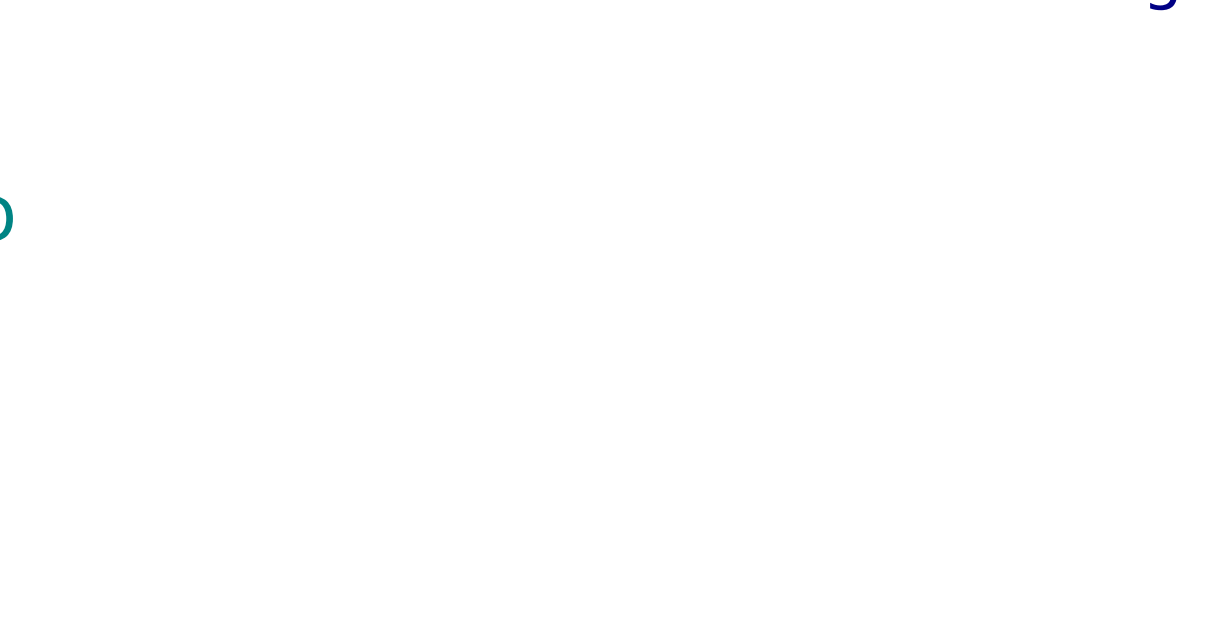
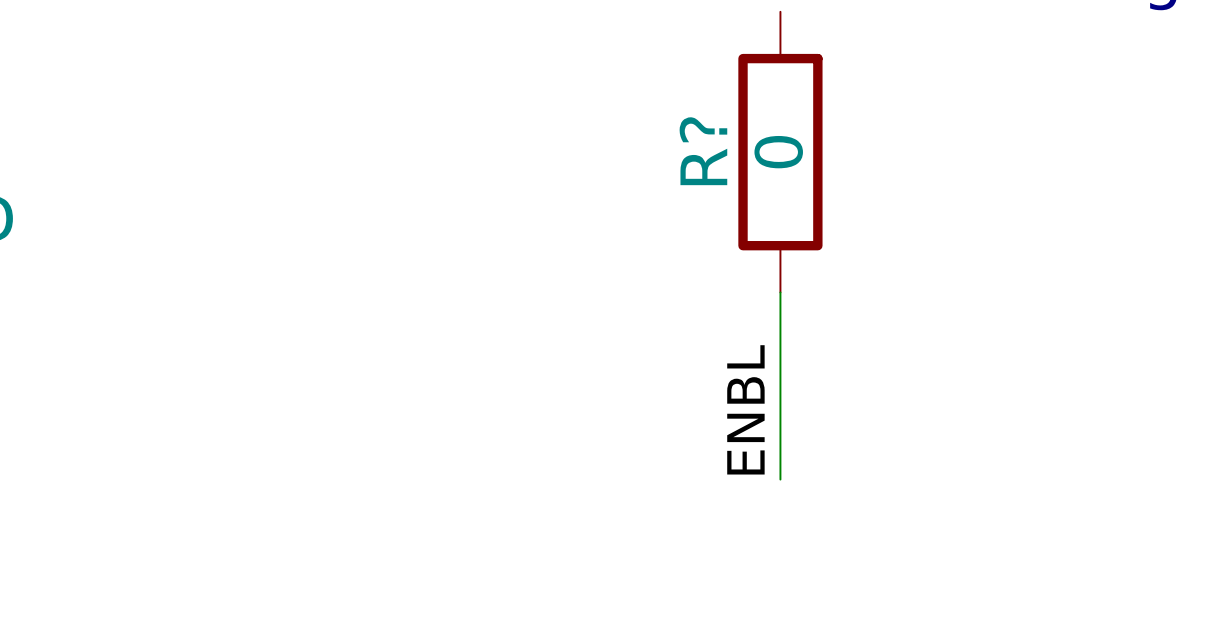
R?: none -> 0 (780, 152)
wire: none -> (780, 292) (780, 479)
label: none -> ENBL (745, 409)

